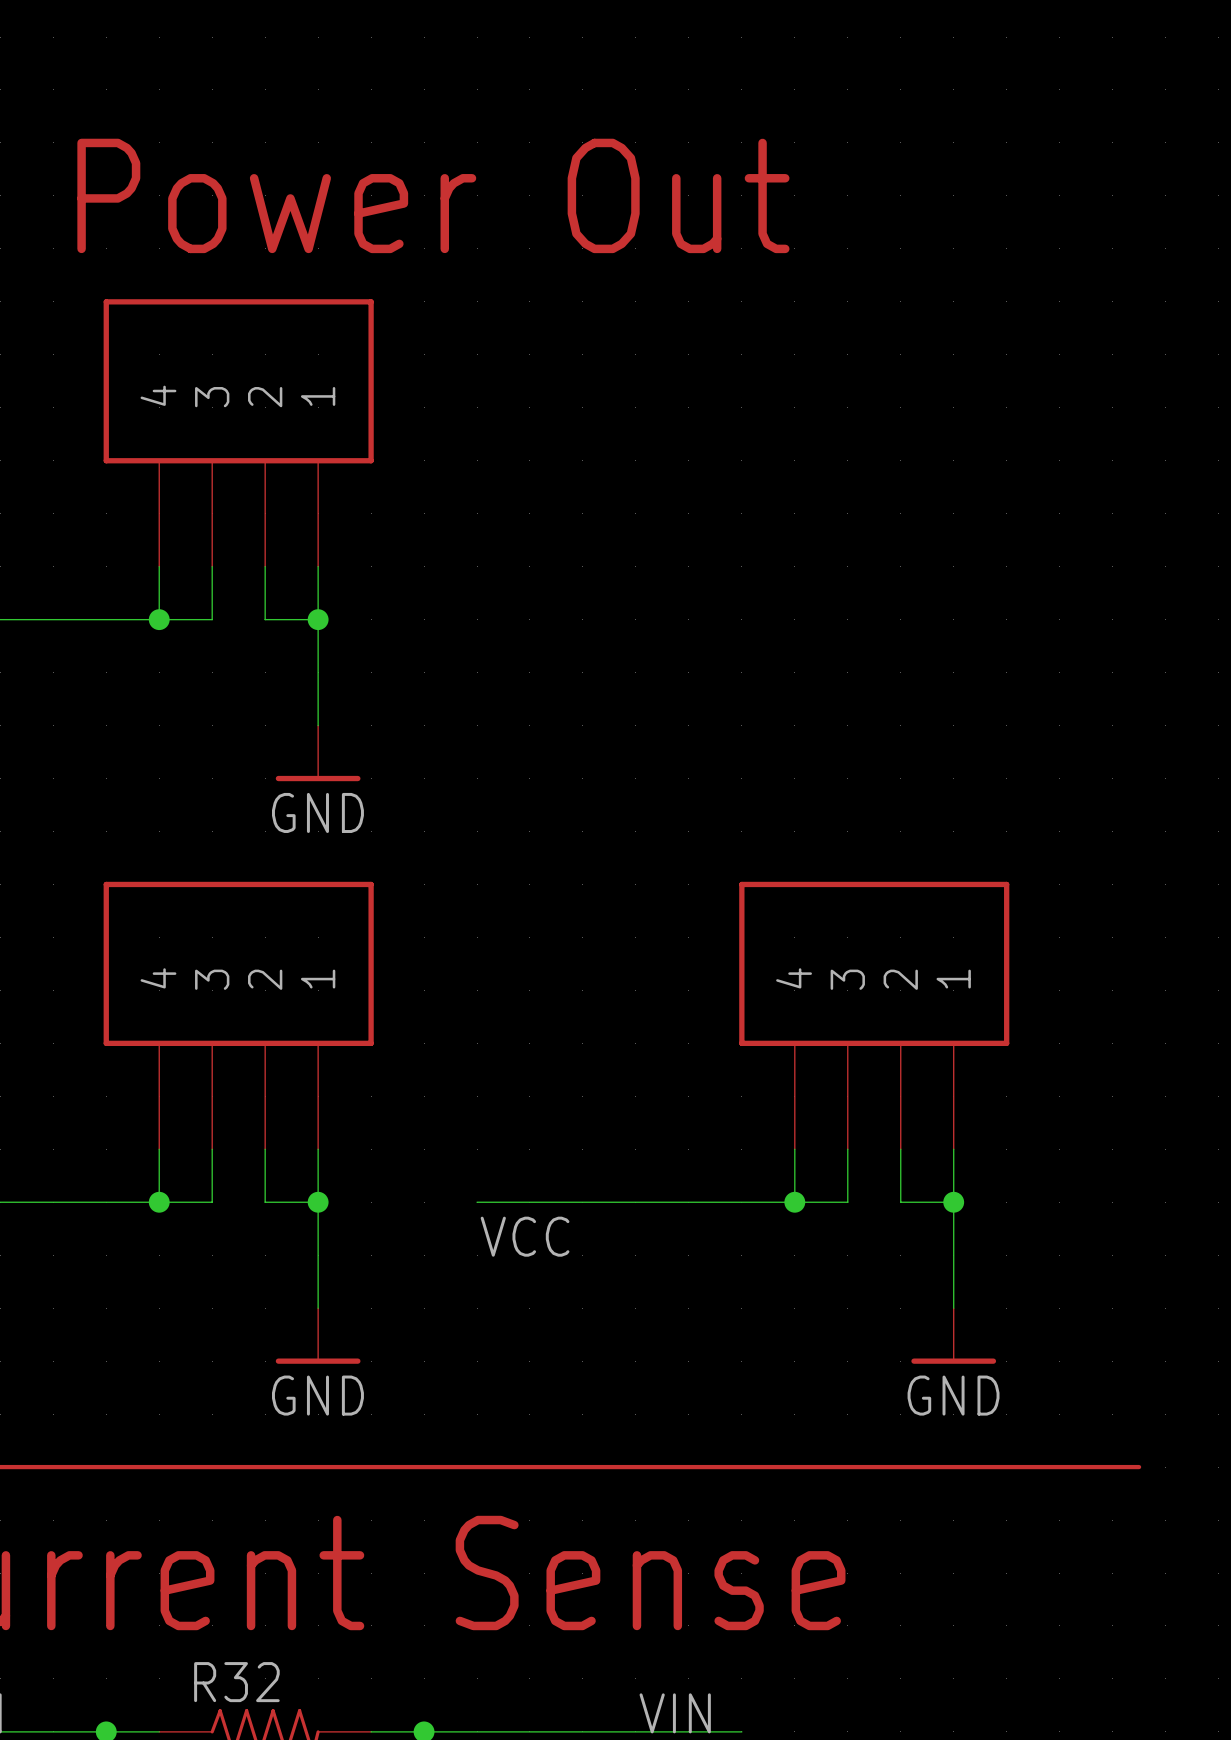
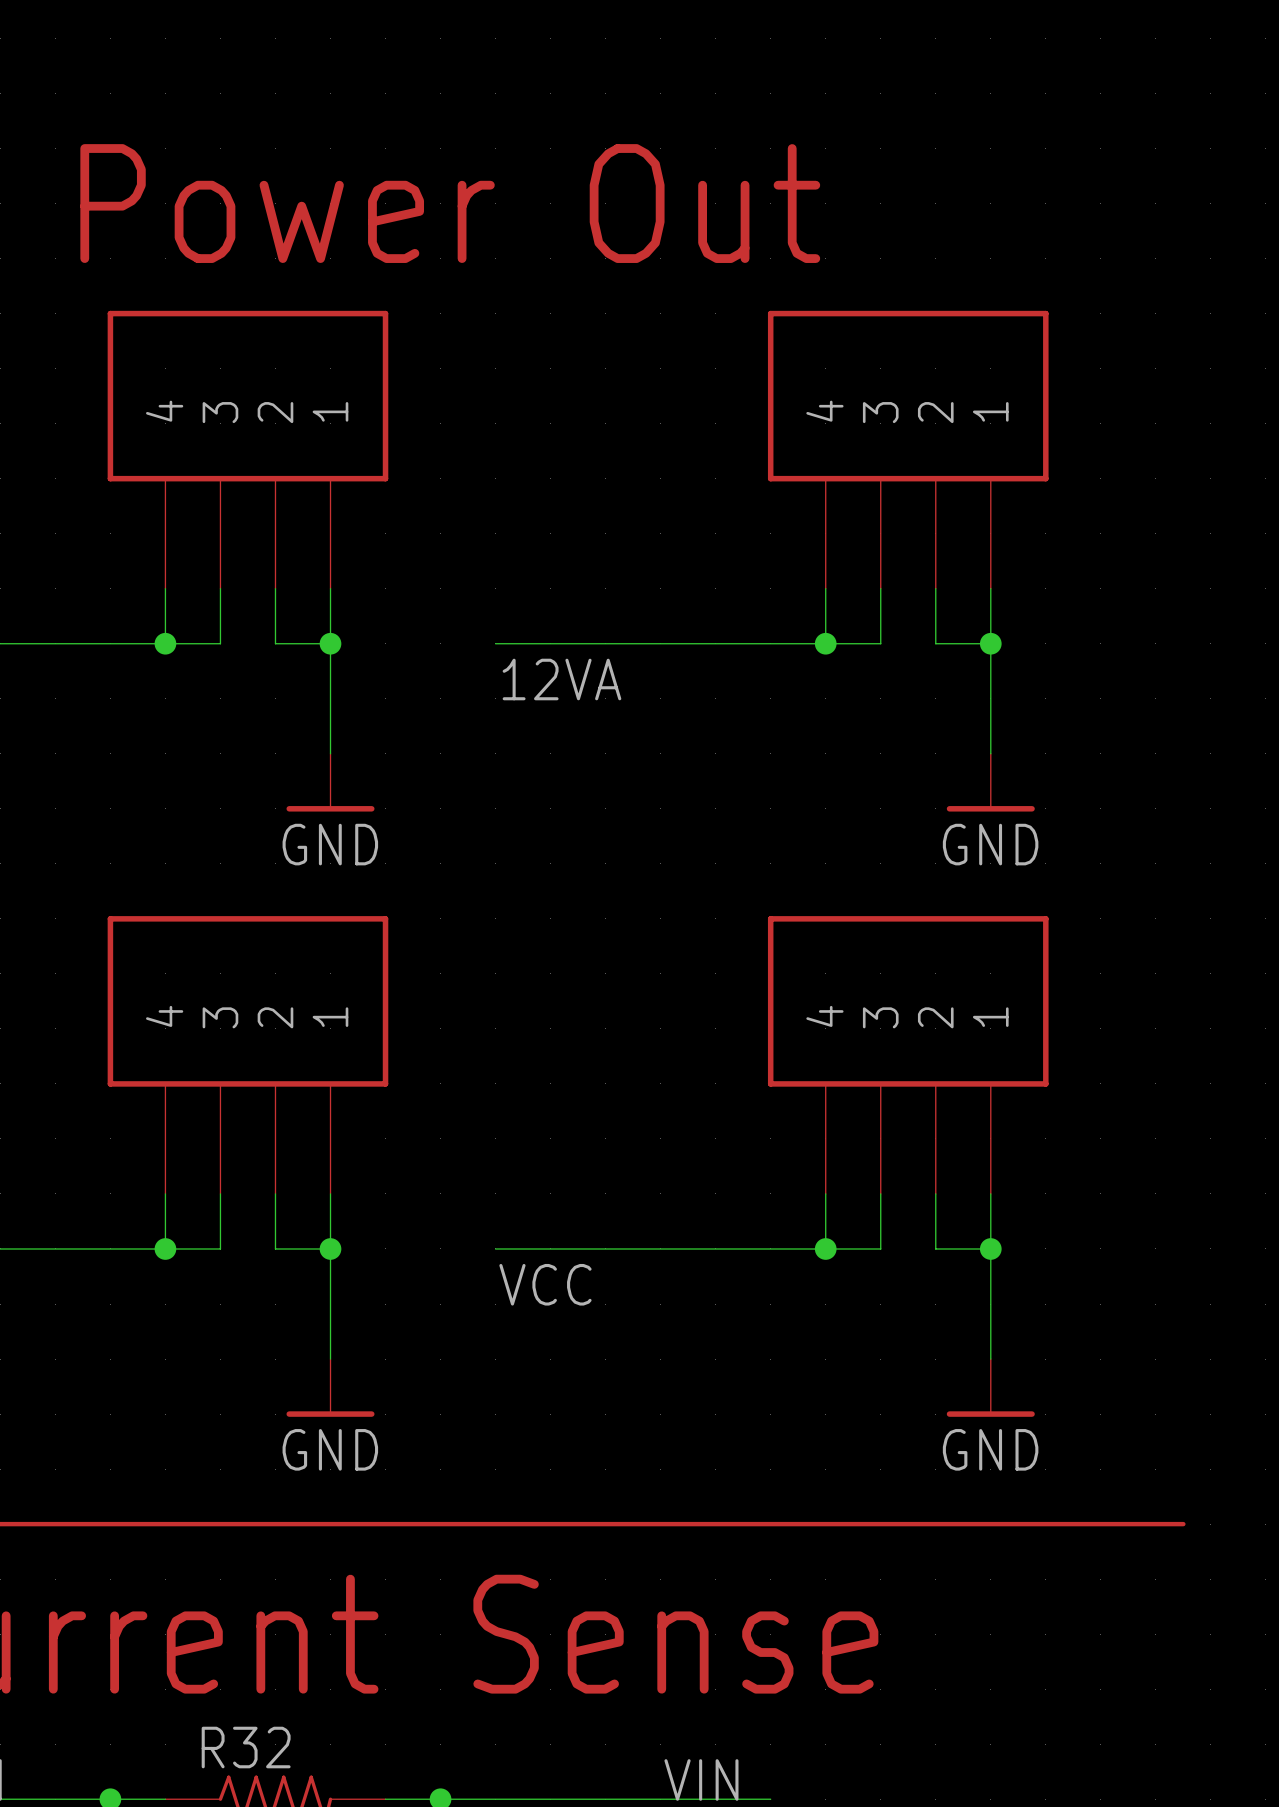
part: none -> (908, 449)
wire: none -> (825, 588) (825, 643)
wire: none -> (880, 588) (880, 643) (495, 643)
wire: none -> (935, 588) (935, 643) (990, 643)
wire: none -> (990, 588) (990, 753)
junction: none -> (825, 643)
junction: none -> (990, 643)
label: none -> 12VA (561, 679)
power symbol: none -> GND (990, 782)

